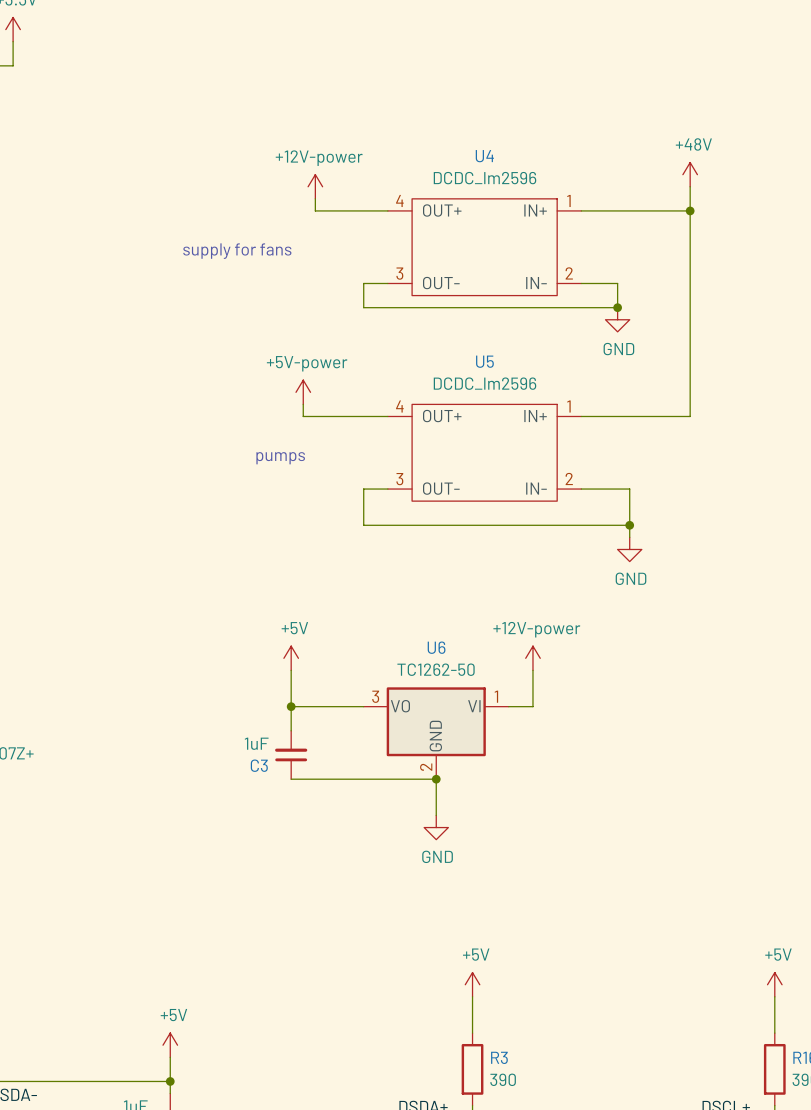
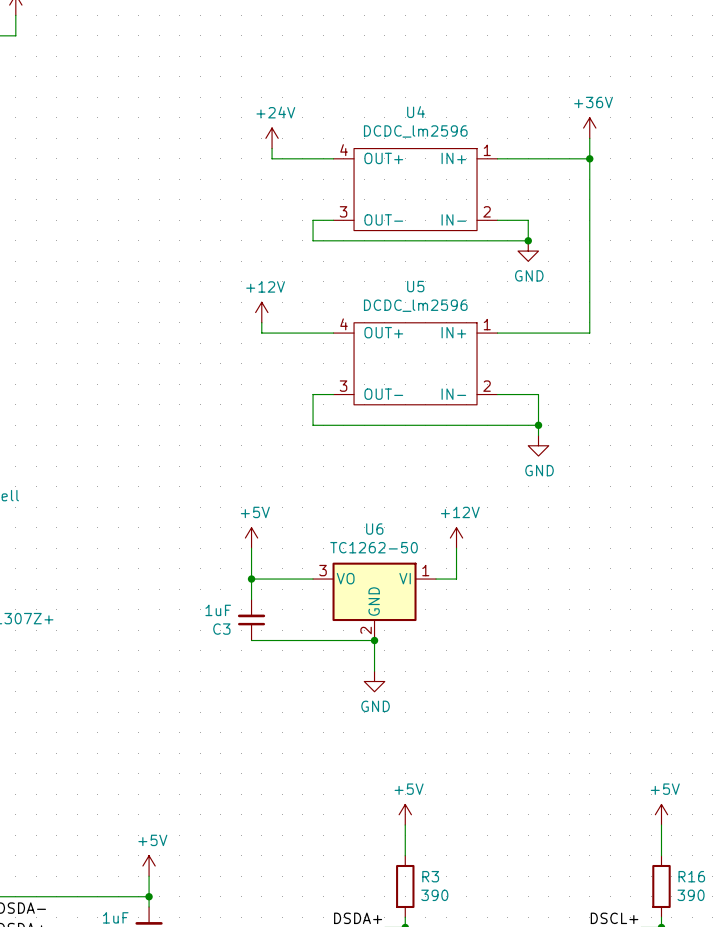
power symbol: +48V (690, 174) -> +36V (589, 128)
power symbol: +12V-power (315, 186) -> +24V (272, 138)
text: supply for fans (237, 251) -> none
power symbol: +5V-power (303, 392) -> +12V (261, 312)
text: pumps (280, 458) -> none
power symbol: +12V-power (532, 658) -> +12V (456, 538)

